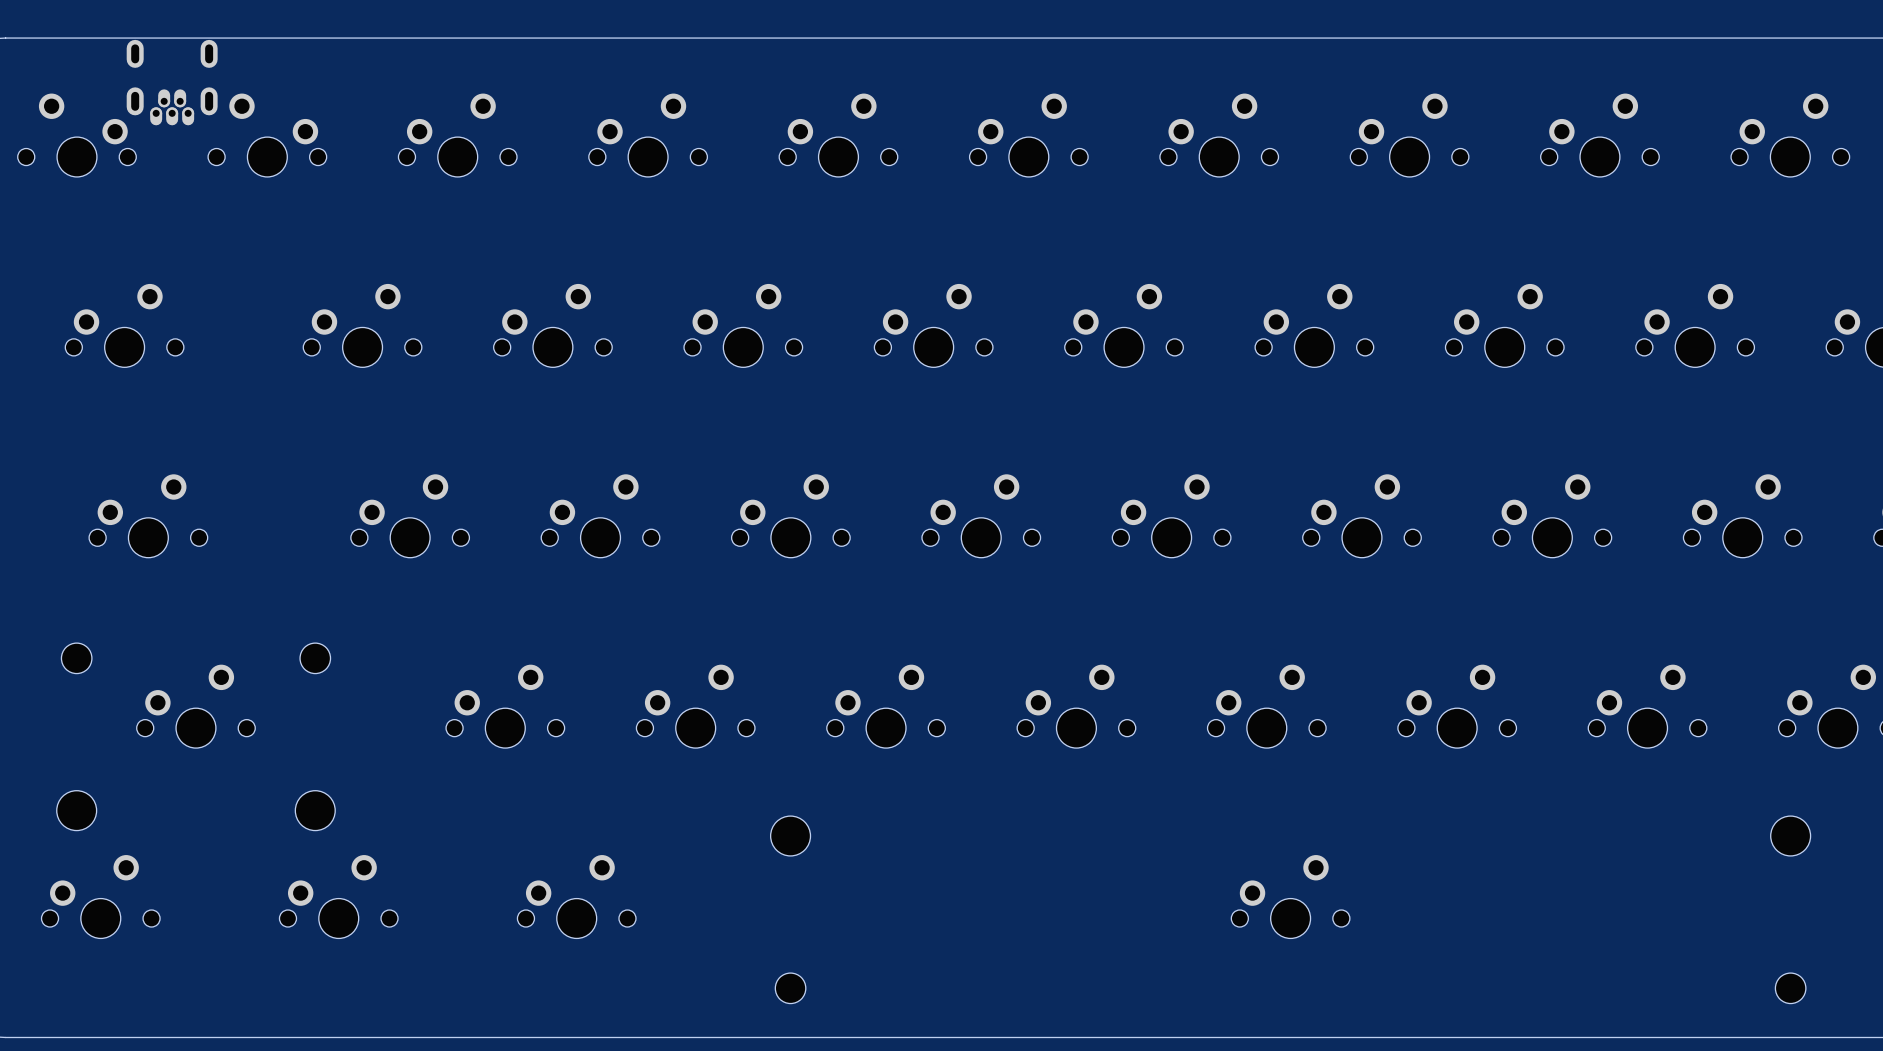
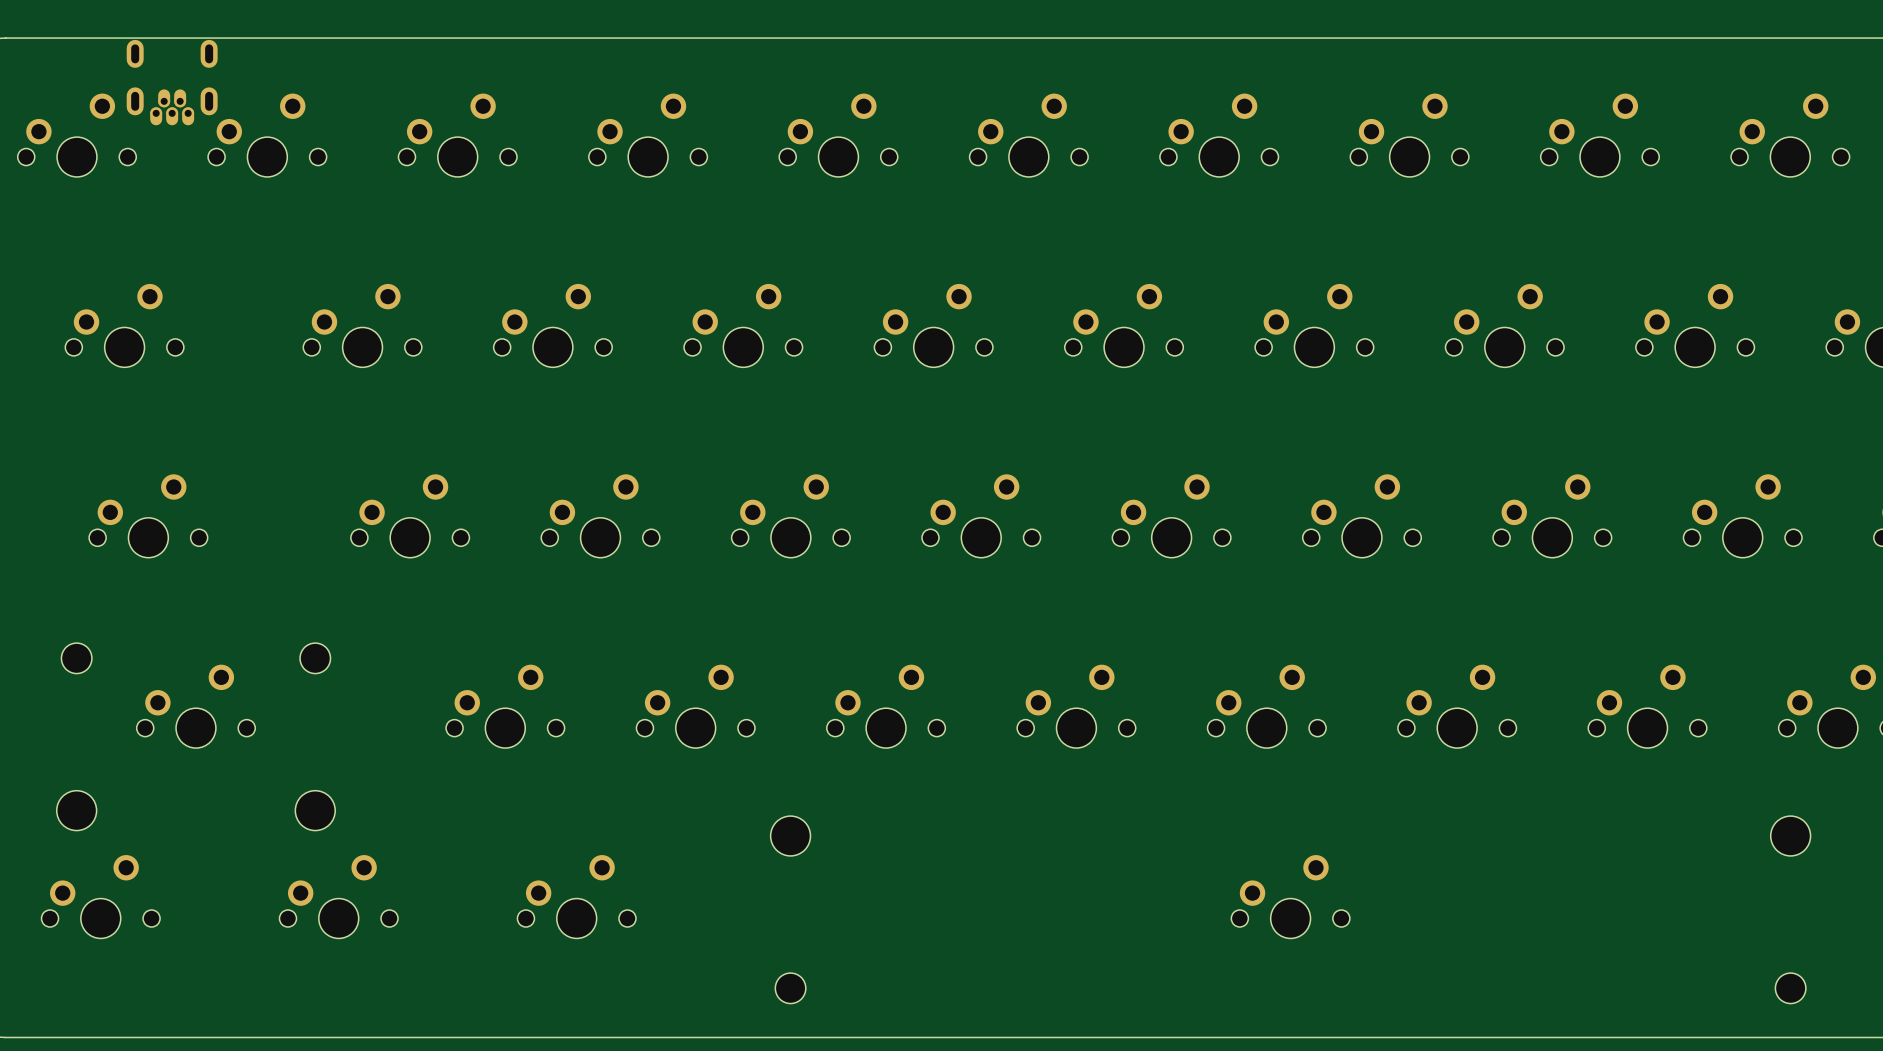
part side: top (76, 135) -> bottom (76, 135)
part side: top (267, 135) -> bottom (267, 135)

